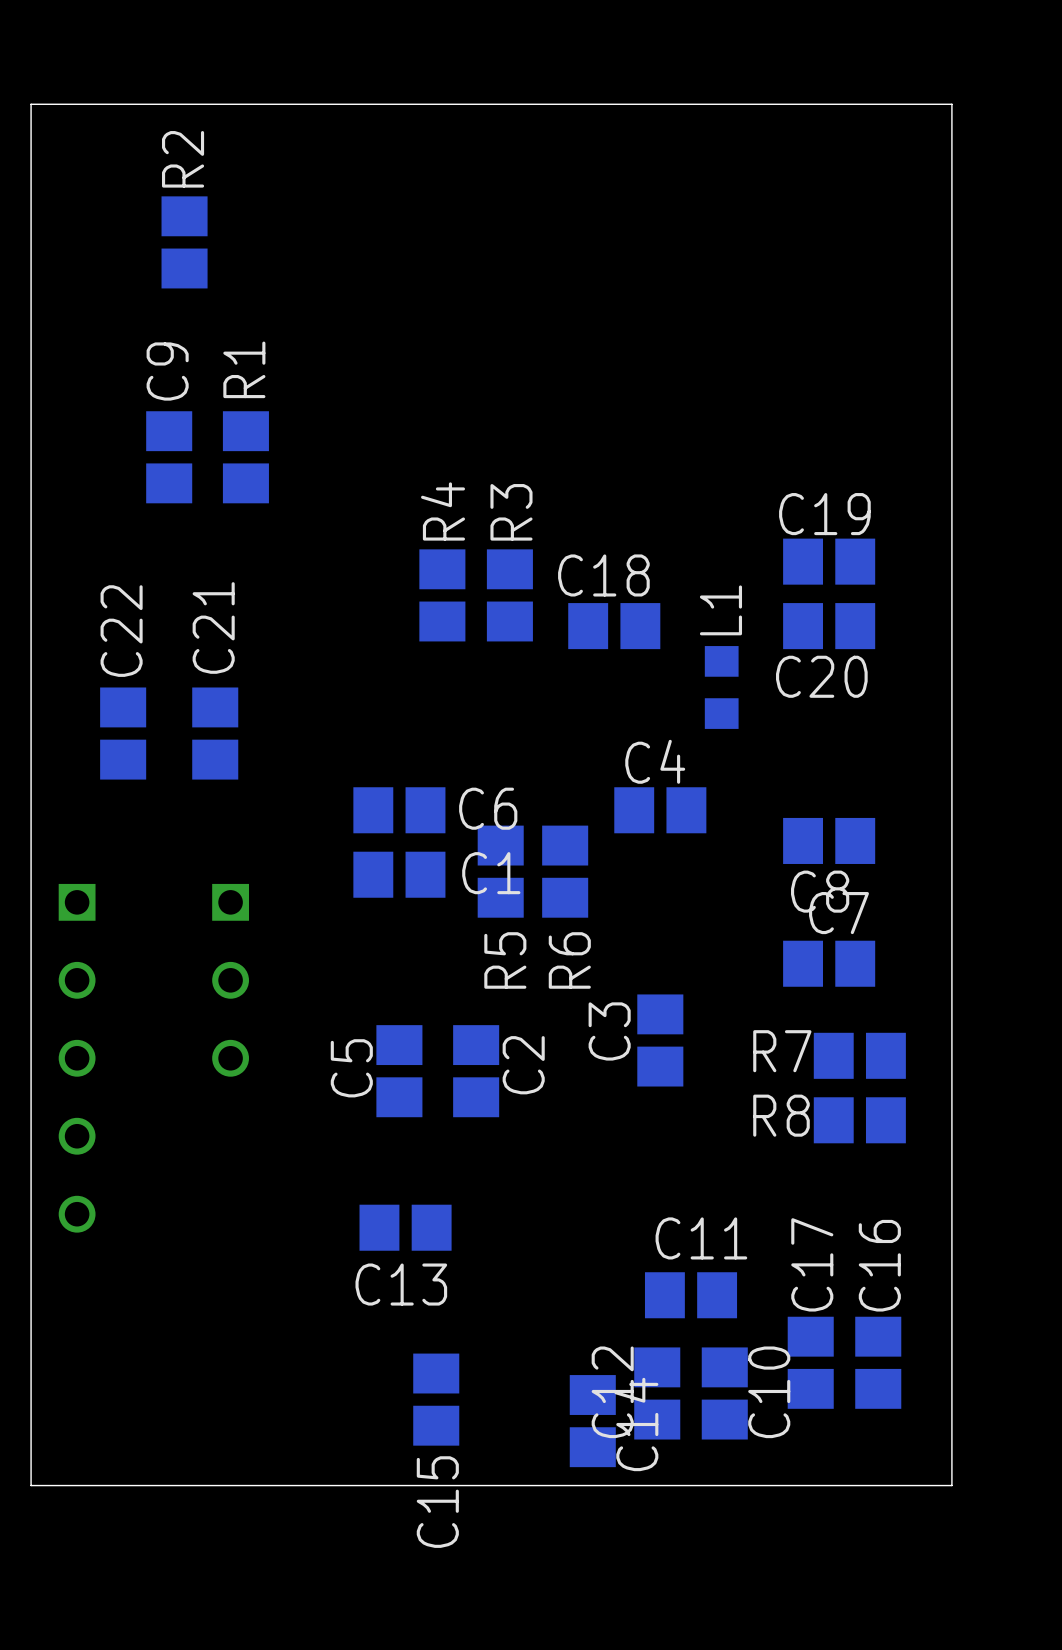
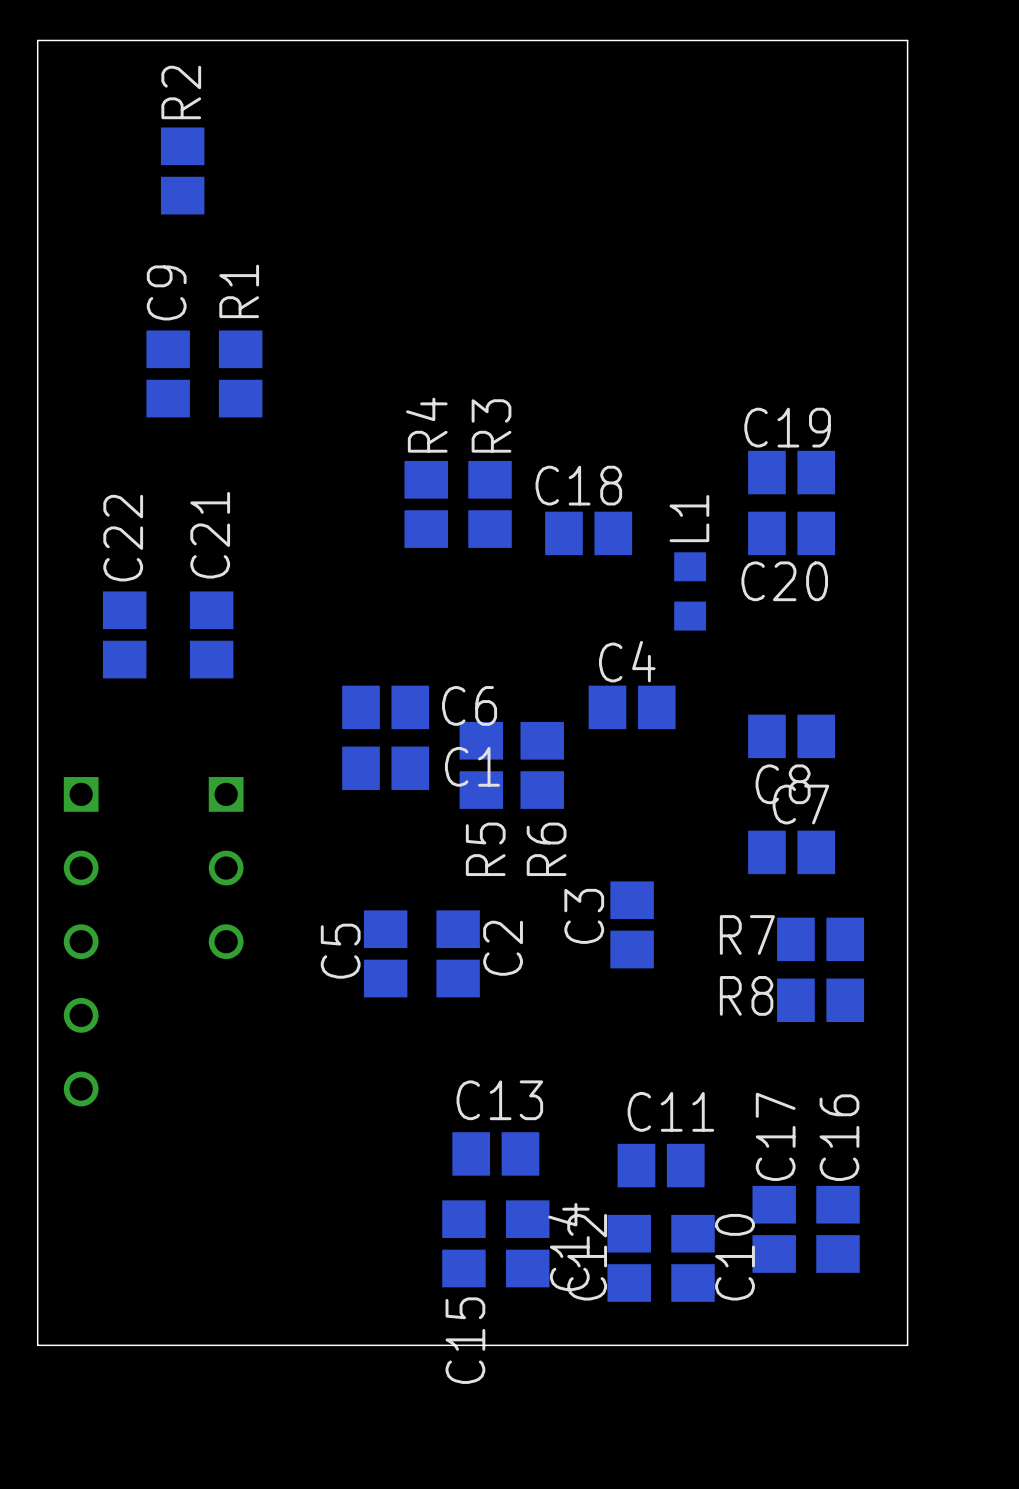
C13 position: (405, 1227) -> (495, 1153)
C13 name position: C13 (401, 1284) -> C13 (499, 1100)
C15 position: (436, 1399) -> (463, 1243)
C14 position: (592, 1421) -> (527, 1243)

